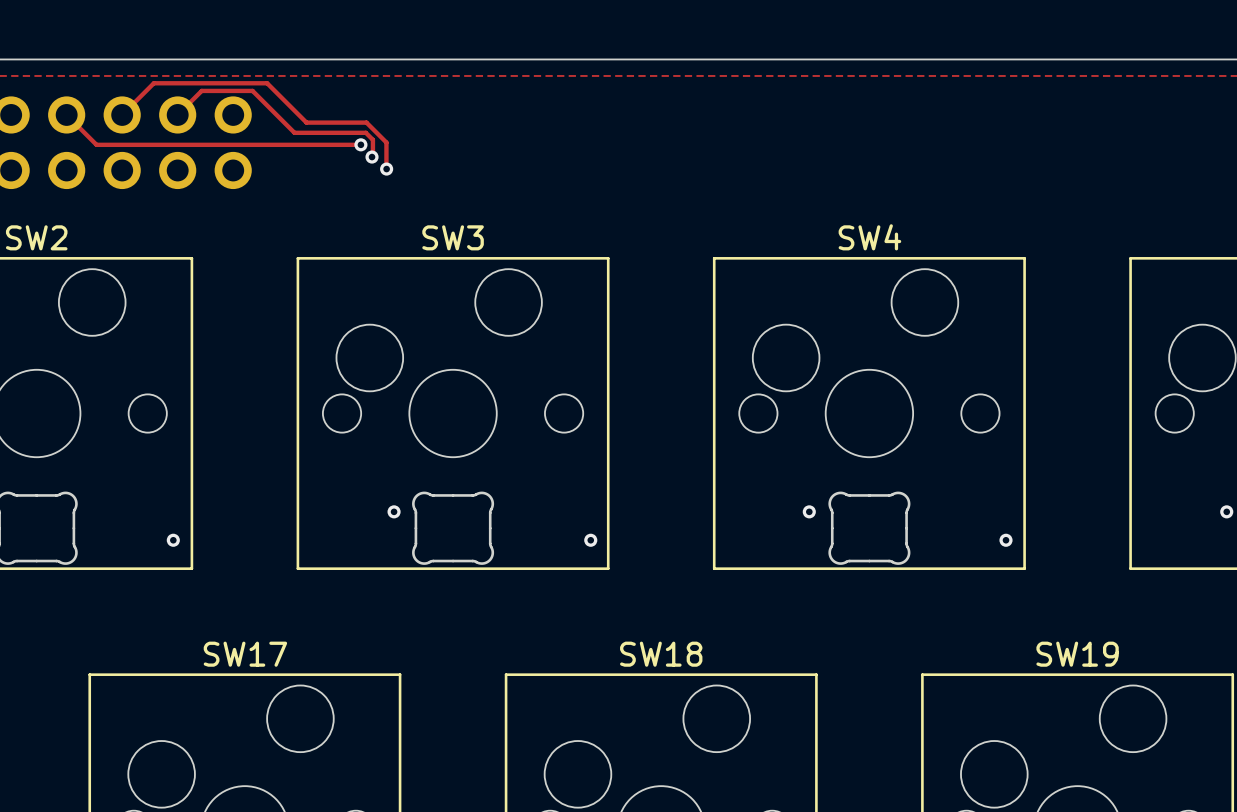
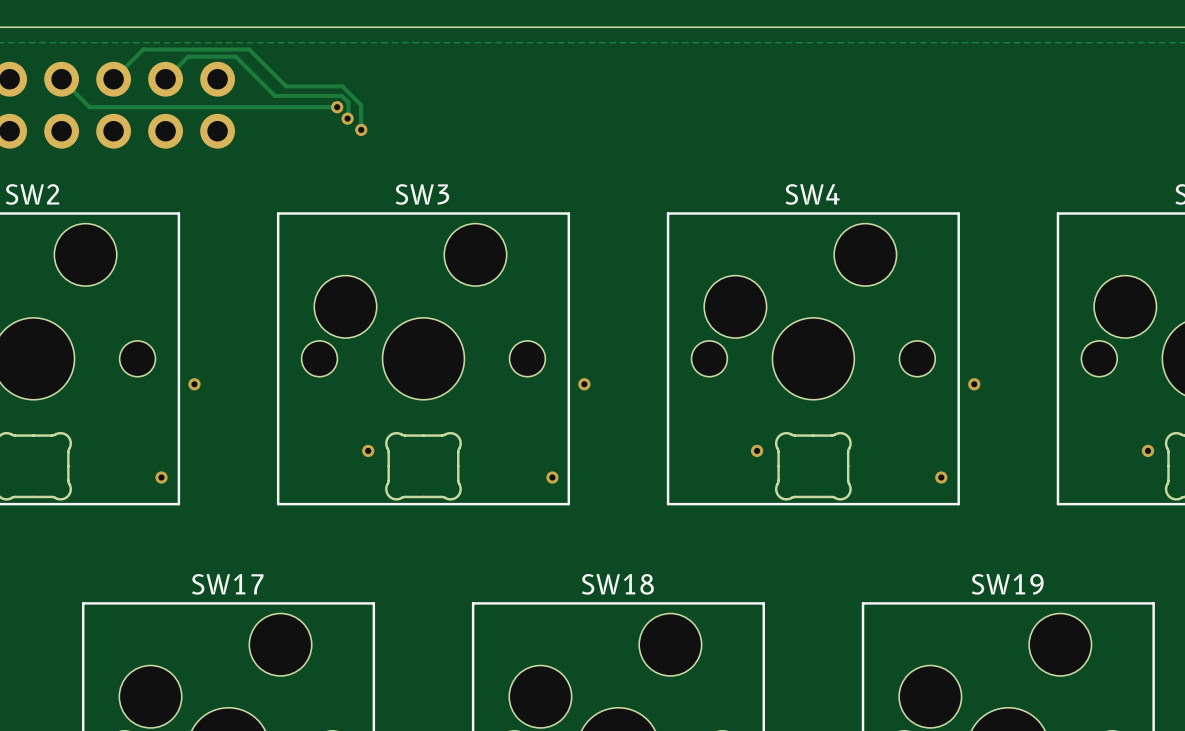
via: none -> (194, 384)
via: none -> (584, 384)
via: none -> (974, 384)

